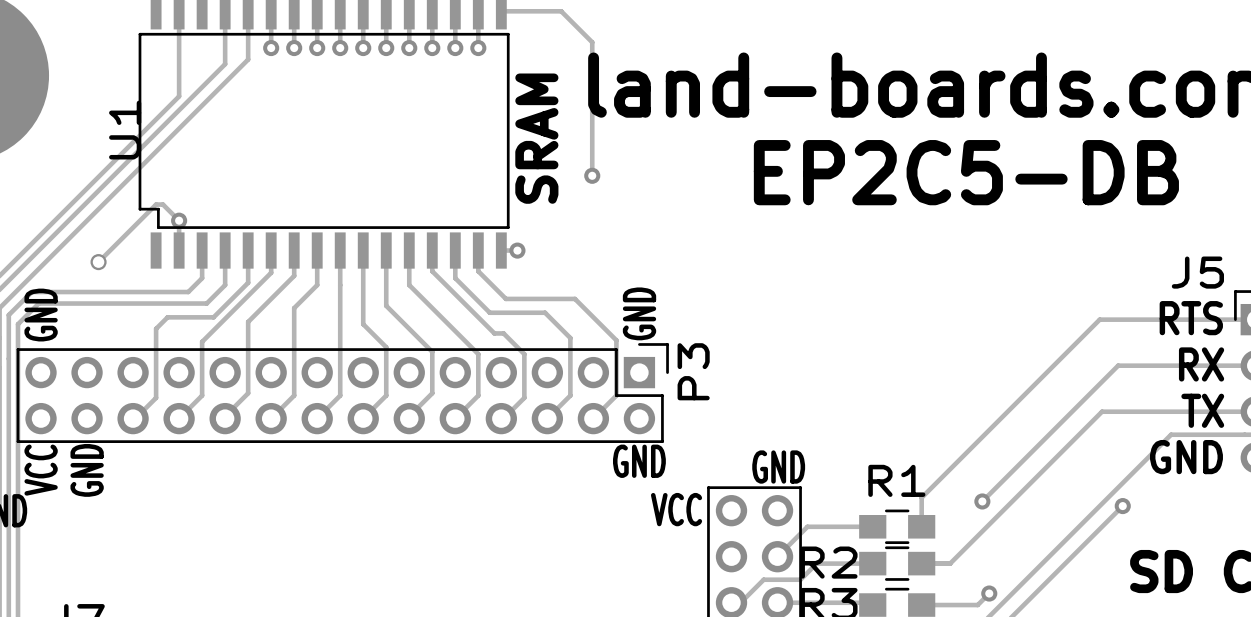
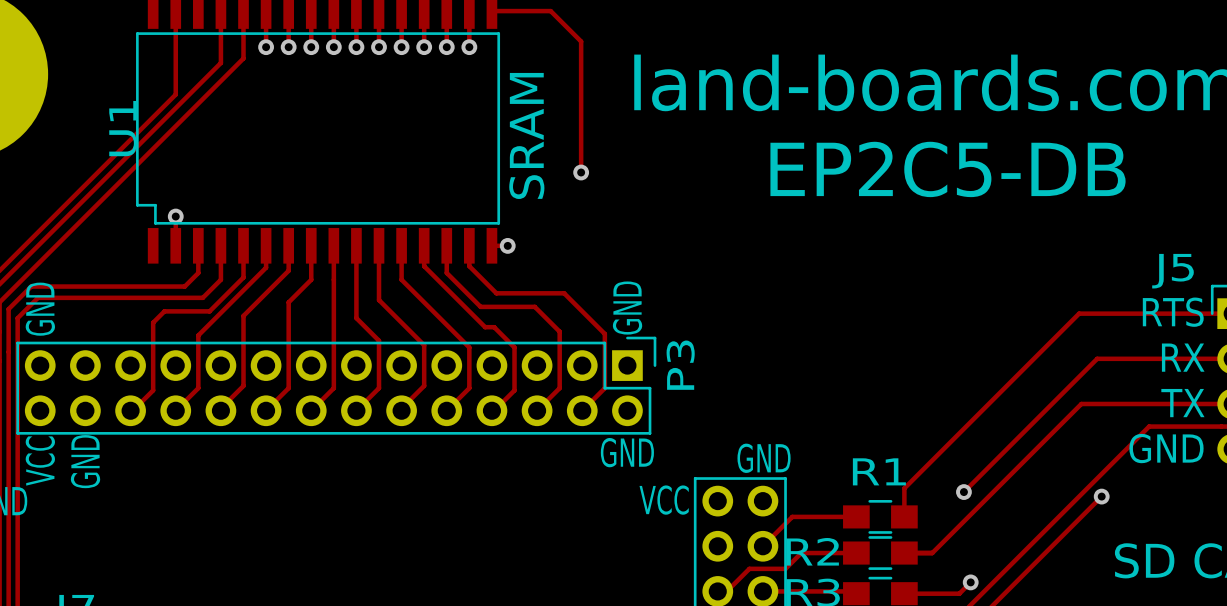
track: (179, 220) (163, 204) (156, 204) (98, 262) -> none
via: (98, 262) -> none

